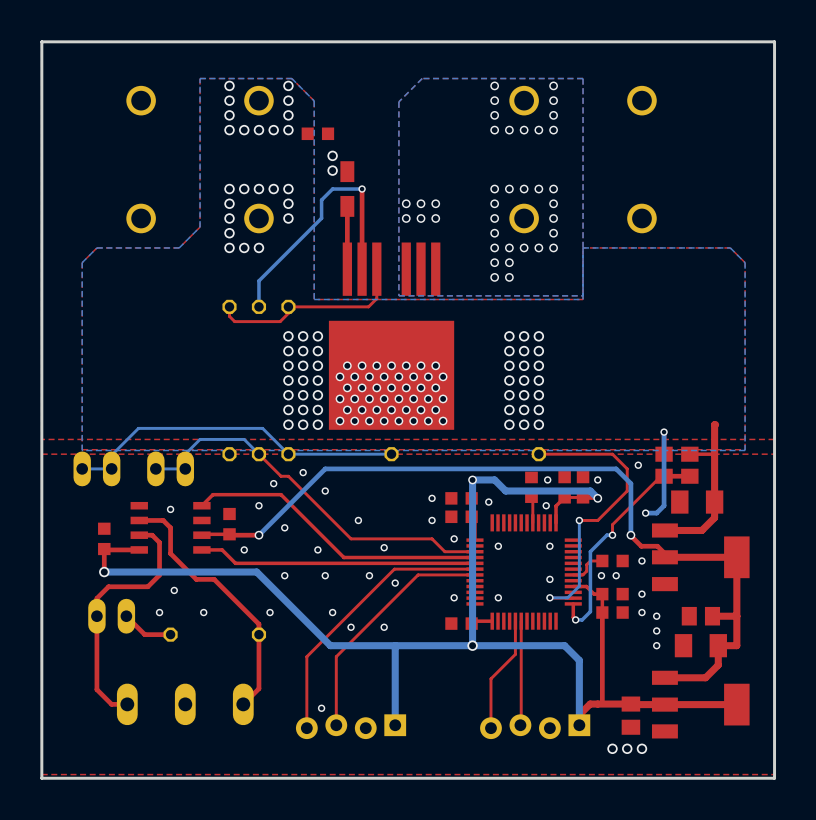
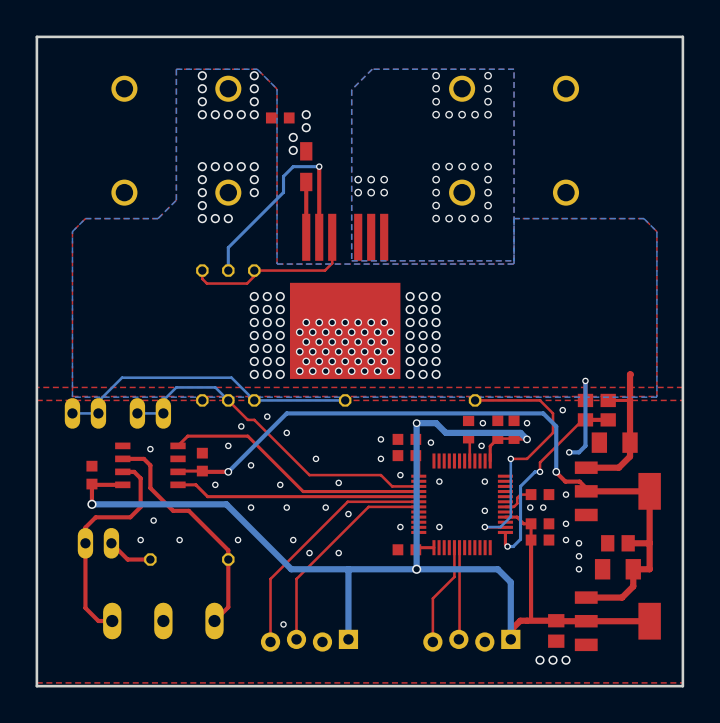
via: none -> (306, 114)
via: none -> (306, 127)
via: (494, 262) -> none
via: (509, 262) -> none
via: (494, 277) -> none
via: (509, 277) -> none
via: none -> (410, 296)
via: none -> (423, 296)
via: none -> (436, 296)
via: (509, 336) -> none
via: (524, 336) -> none
via: (538, 336) -> none
via: none -> (410, 309)
via: none -> (423, 309)
via: none -> (436, 309)
via: (509, 351) -> none
via: (524, 351) -> none
via: (538, 351) -> none
via: none -> (410, 322)
via: none -> (423, 322)
via: none -> (436, 322)
via: (509, 365) -> none
via: (524, 365) -> none
via: (538, 365) -> none
via: none -> (410, 335)
via: none -> (423, 335)
via: none -> (436, 335)
via: (509, 380) -> none
via: (524, 380) -> none
via: (538, 380) -> none
via: none -> (410, 348)
via: none -> (423, 348)
via: none -> (436, 348)
via: (509, 395) -> none
via: (524, 395) -> none
via: (538, 395) -> none
via: none -> (410, 361)
via: none -> (423, 361)
via: none -> (436, 361)
via: (509, 409) -> none
via: (524, 409) -> none
via: (538, 409) -> none
via: none -> (410, 374)
via: none -> (423, 374)
via: none -> (436, 374)
via: (509, 424) -> none
via: (524, 424) -> none
via: (538, 424) -> none

